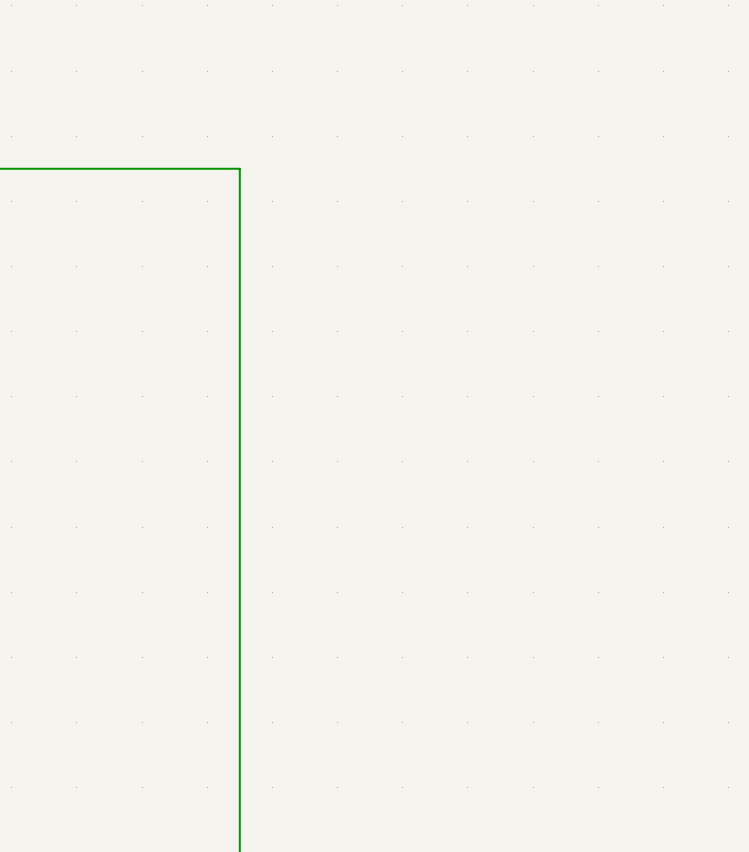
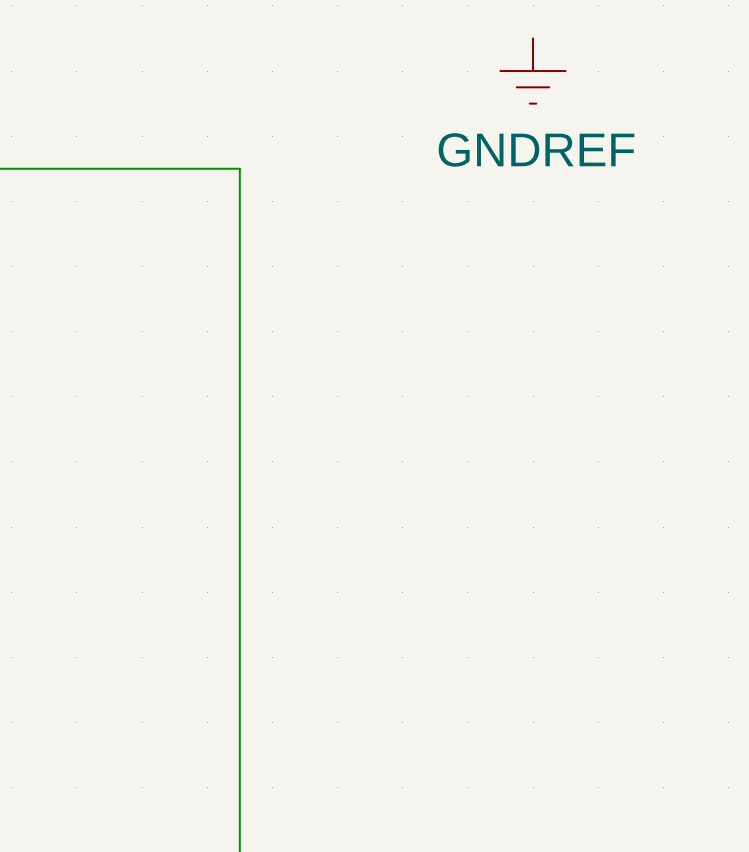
power symbol: none -> GNDREF (533, 71)

